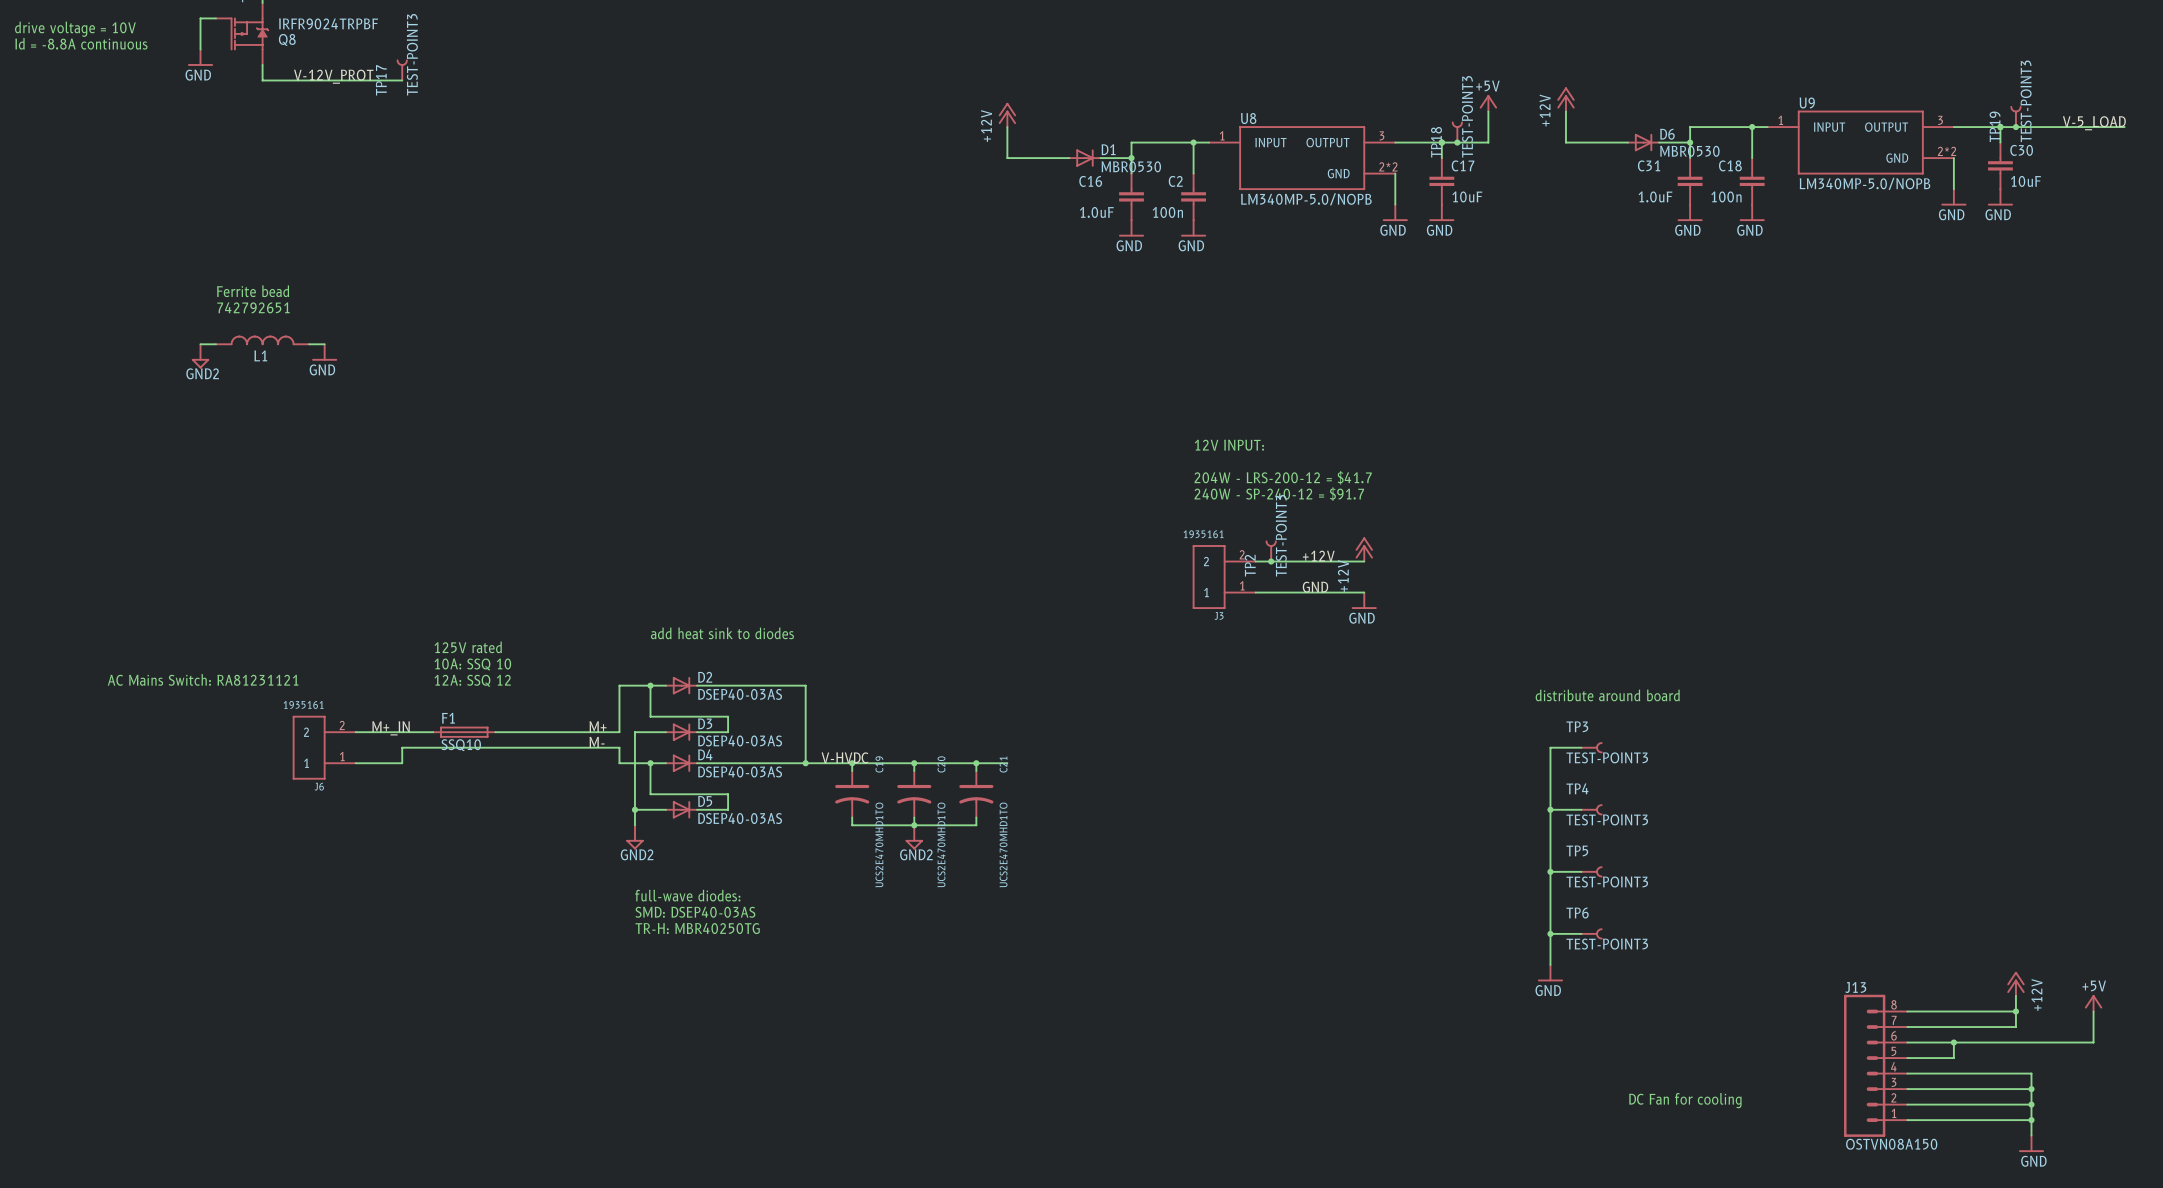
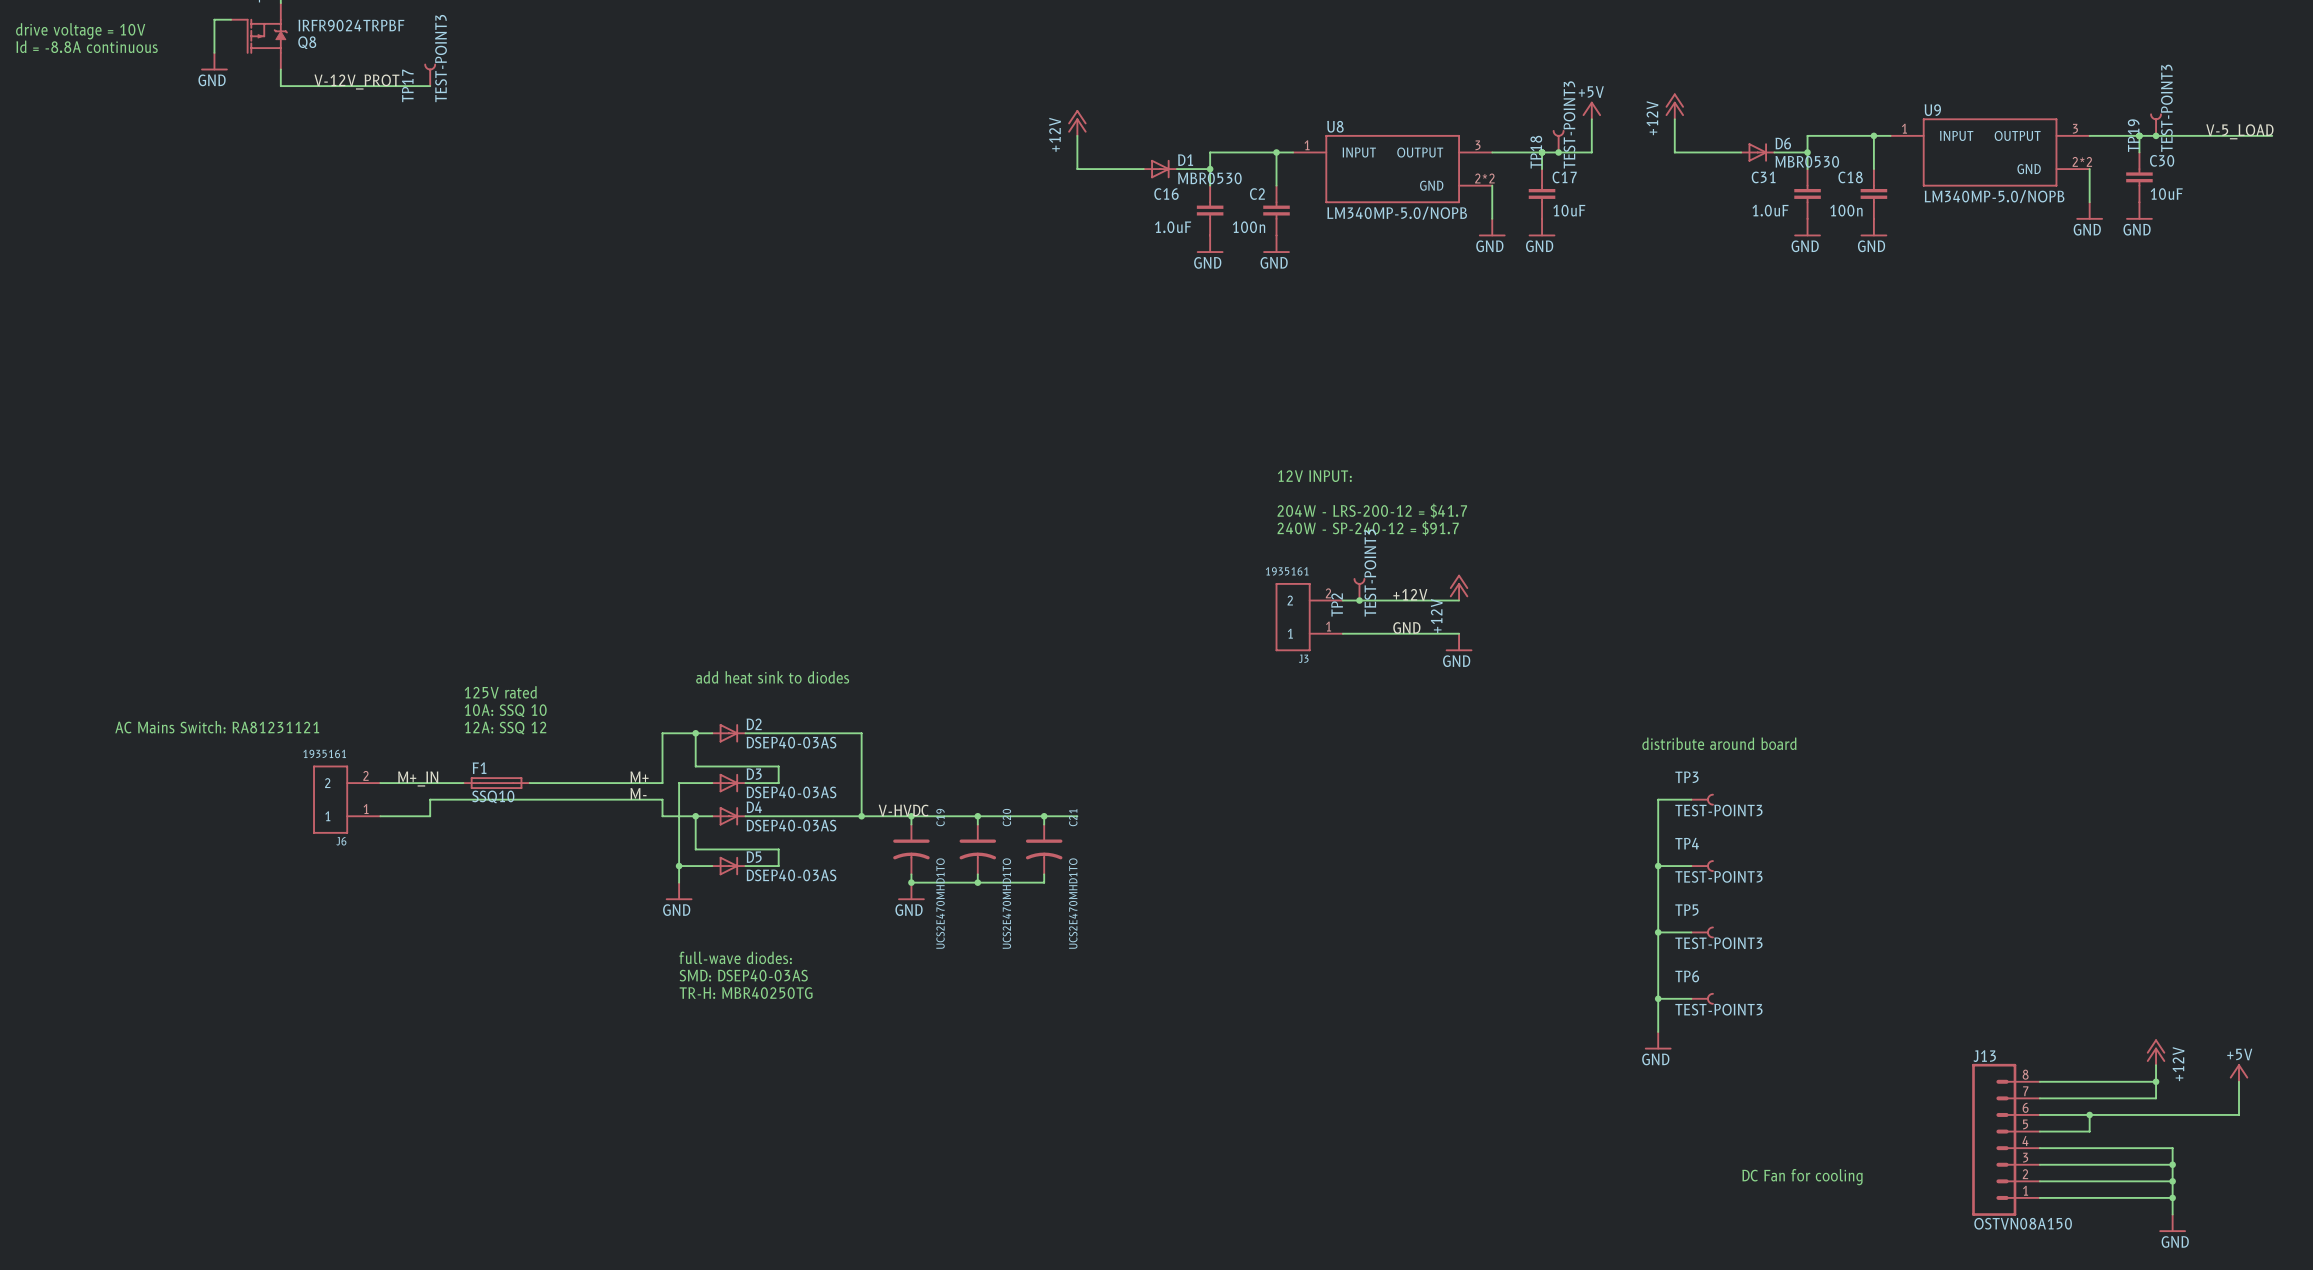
text: Ferrite bead (253, 291) -> none
text: 742792651 (253, 307) -> none
L1: (262, 340) -> none
wire: (200, 344) (216, 344) -> none
wire: (309, 344) (324, 344) -> none
power symbol: GND (324, 352) -> none
power symbol: GND2 (200, 356) -> none
junction: none -> (911, 882)
power symbol: none -> GND (911, 891)
power symbol: GND2 (634, 837) -> GND (679, 891)
power symbol: GND2 (914, 837) -> none

